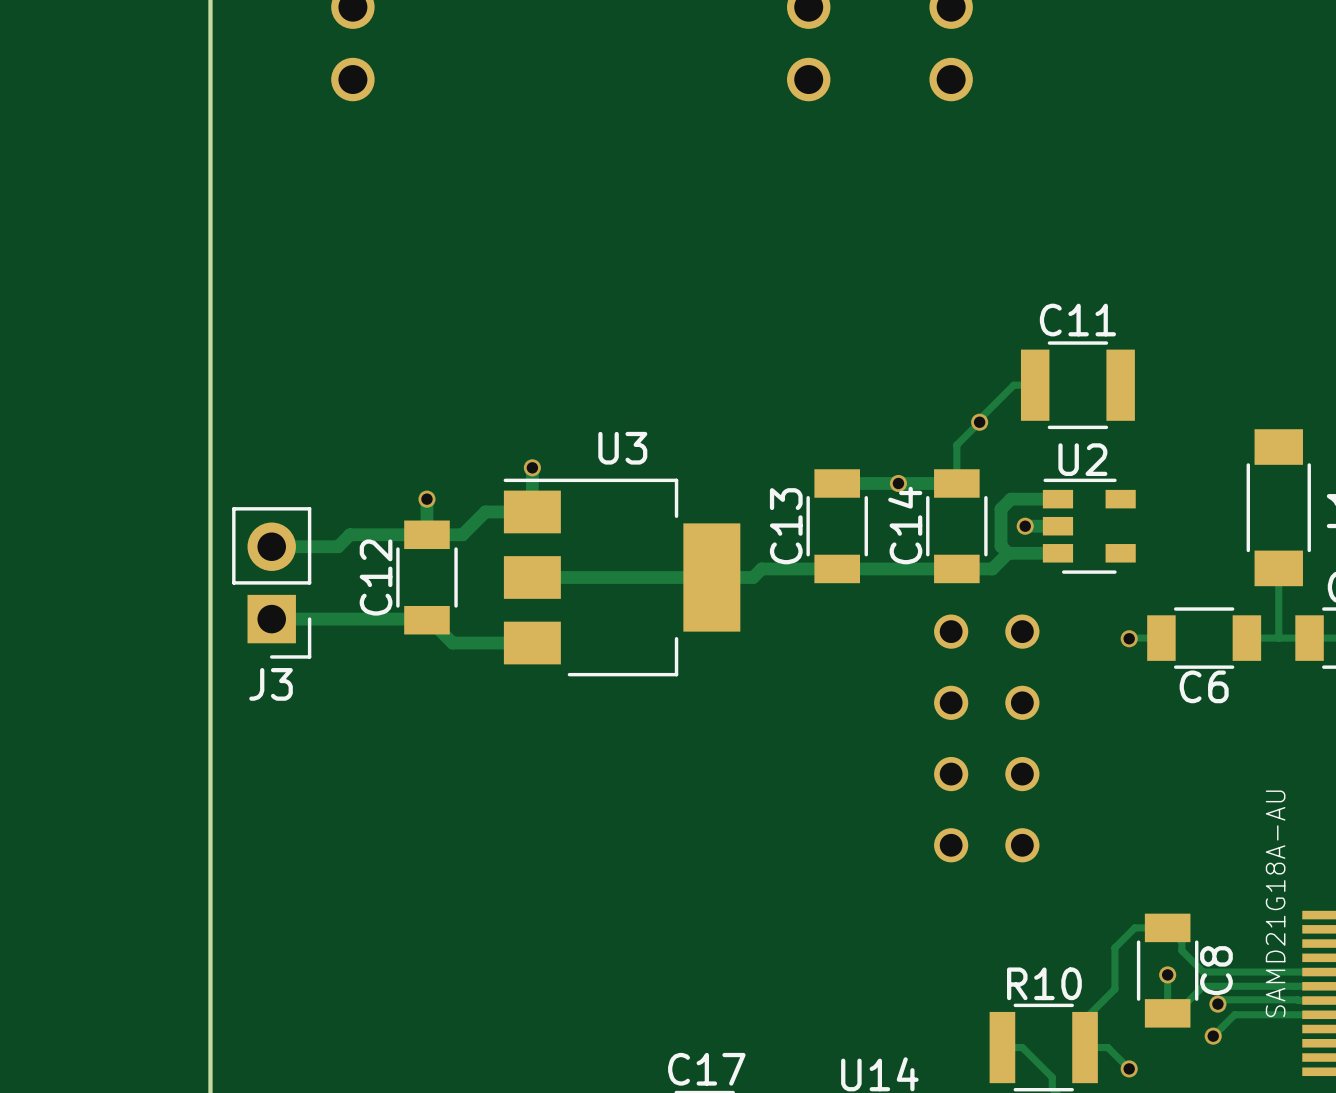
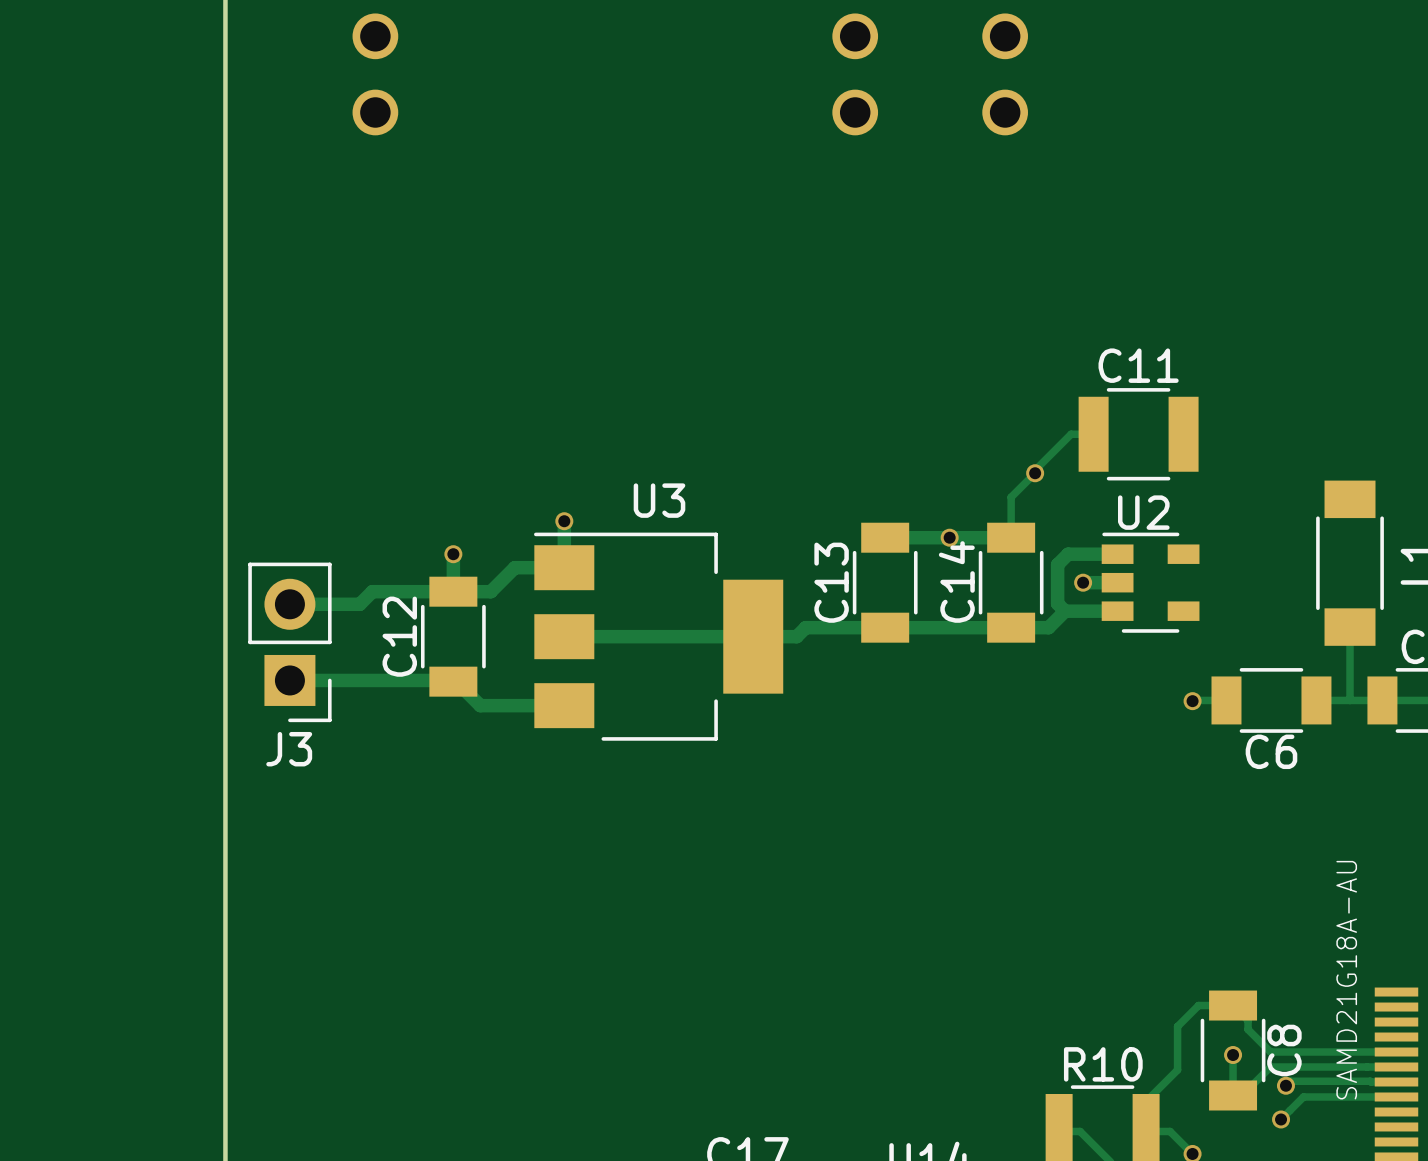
part: (951, 631) -> none
part: (1022, 631) -> none
part: (951, 702) -> none
part: (1022, 702) -> none
part: (951, 774) -> none
part: (1022, 774) -> none
part: (951, 845) -> none
part: (1022, 845) -> none

